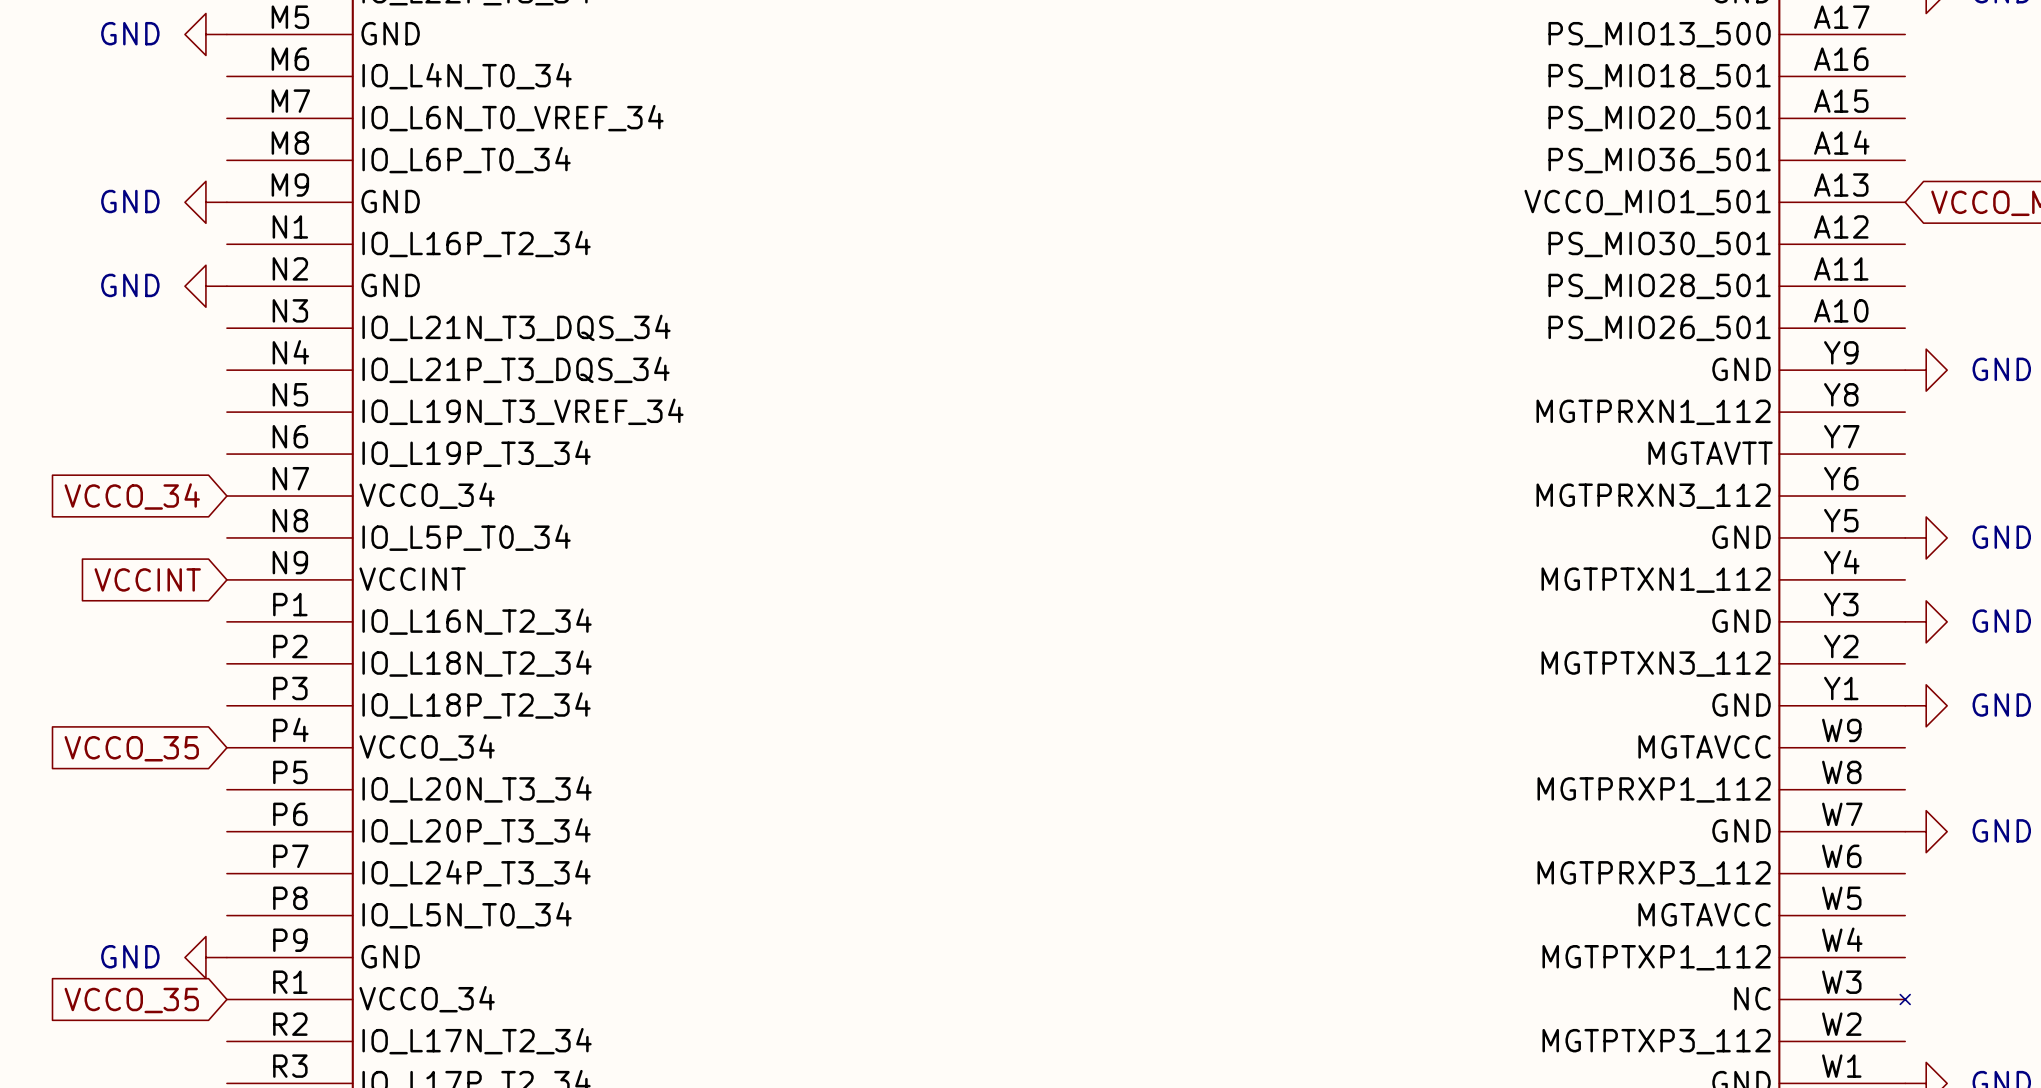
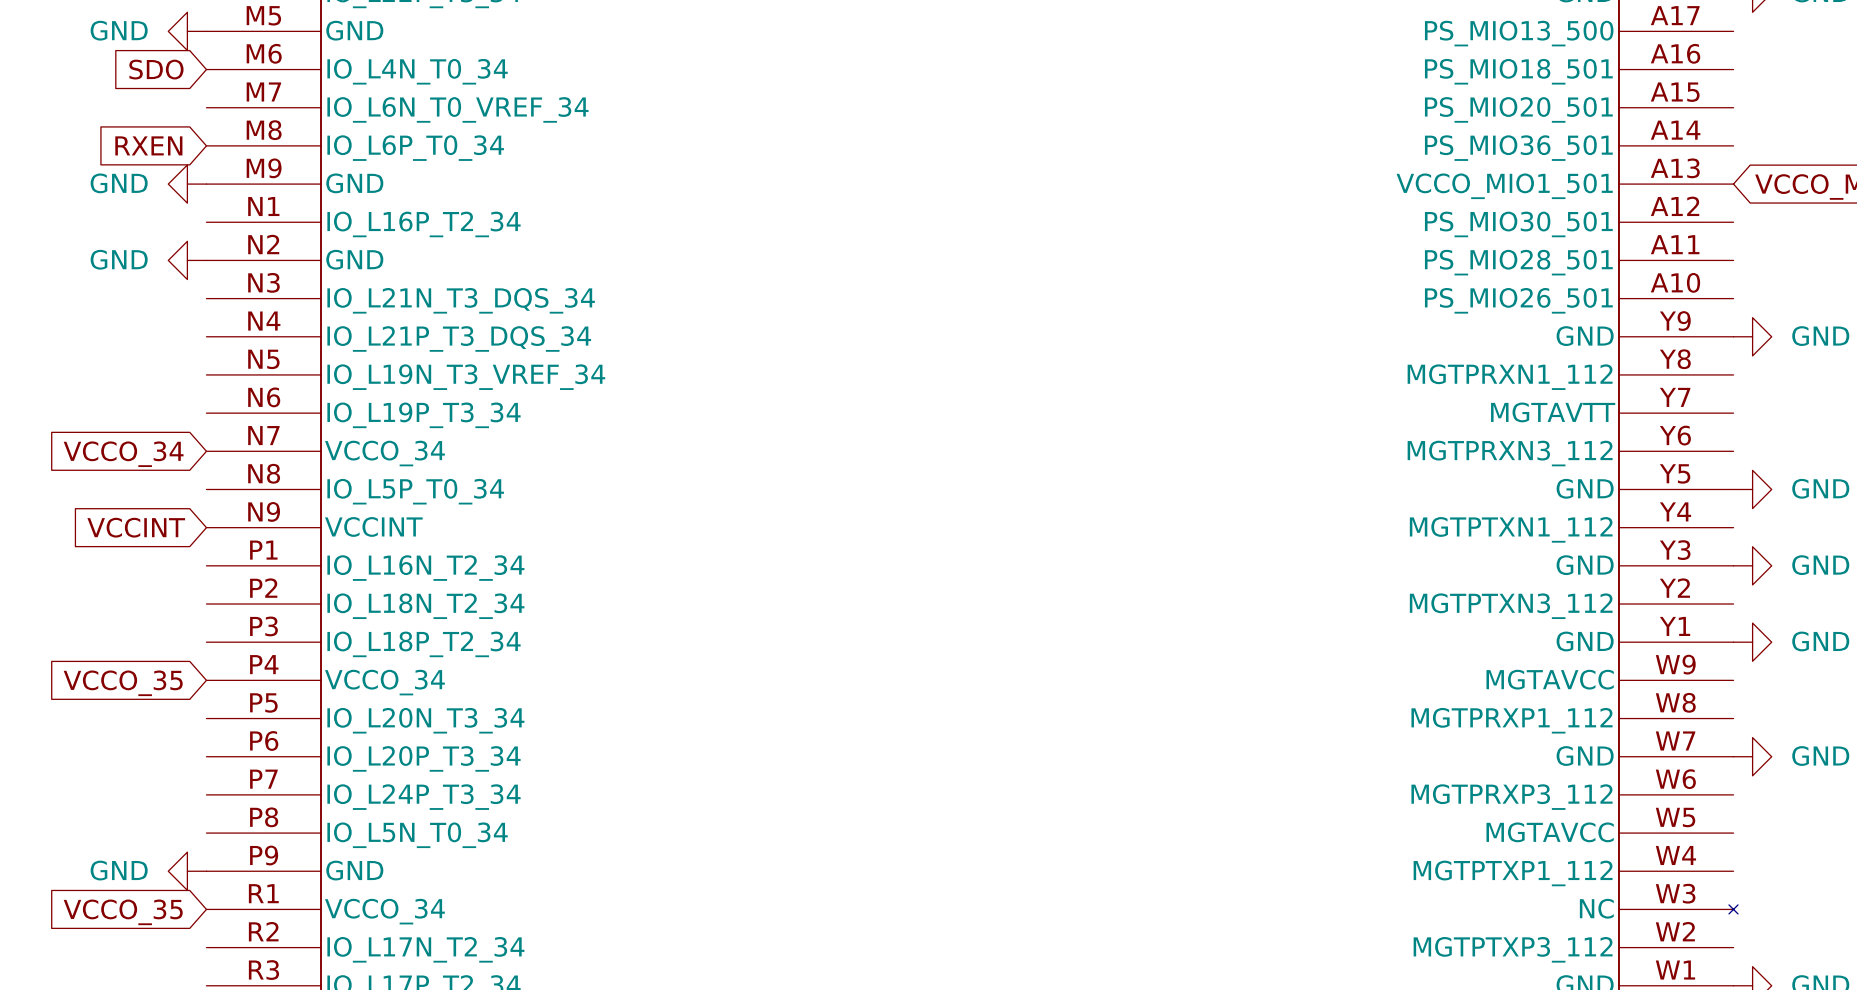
global label: none -> SDO (156, 69)
global label: none -> RXEN (148, 145)

